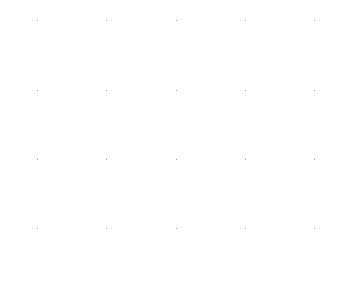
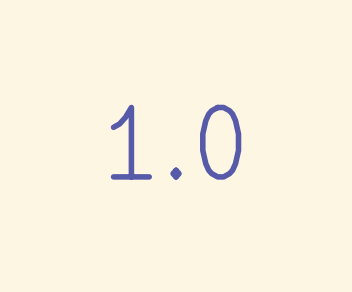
text: none -> 1.0 (176, 142)

